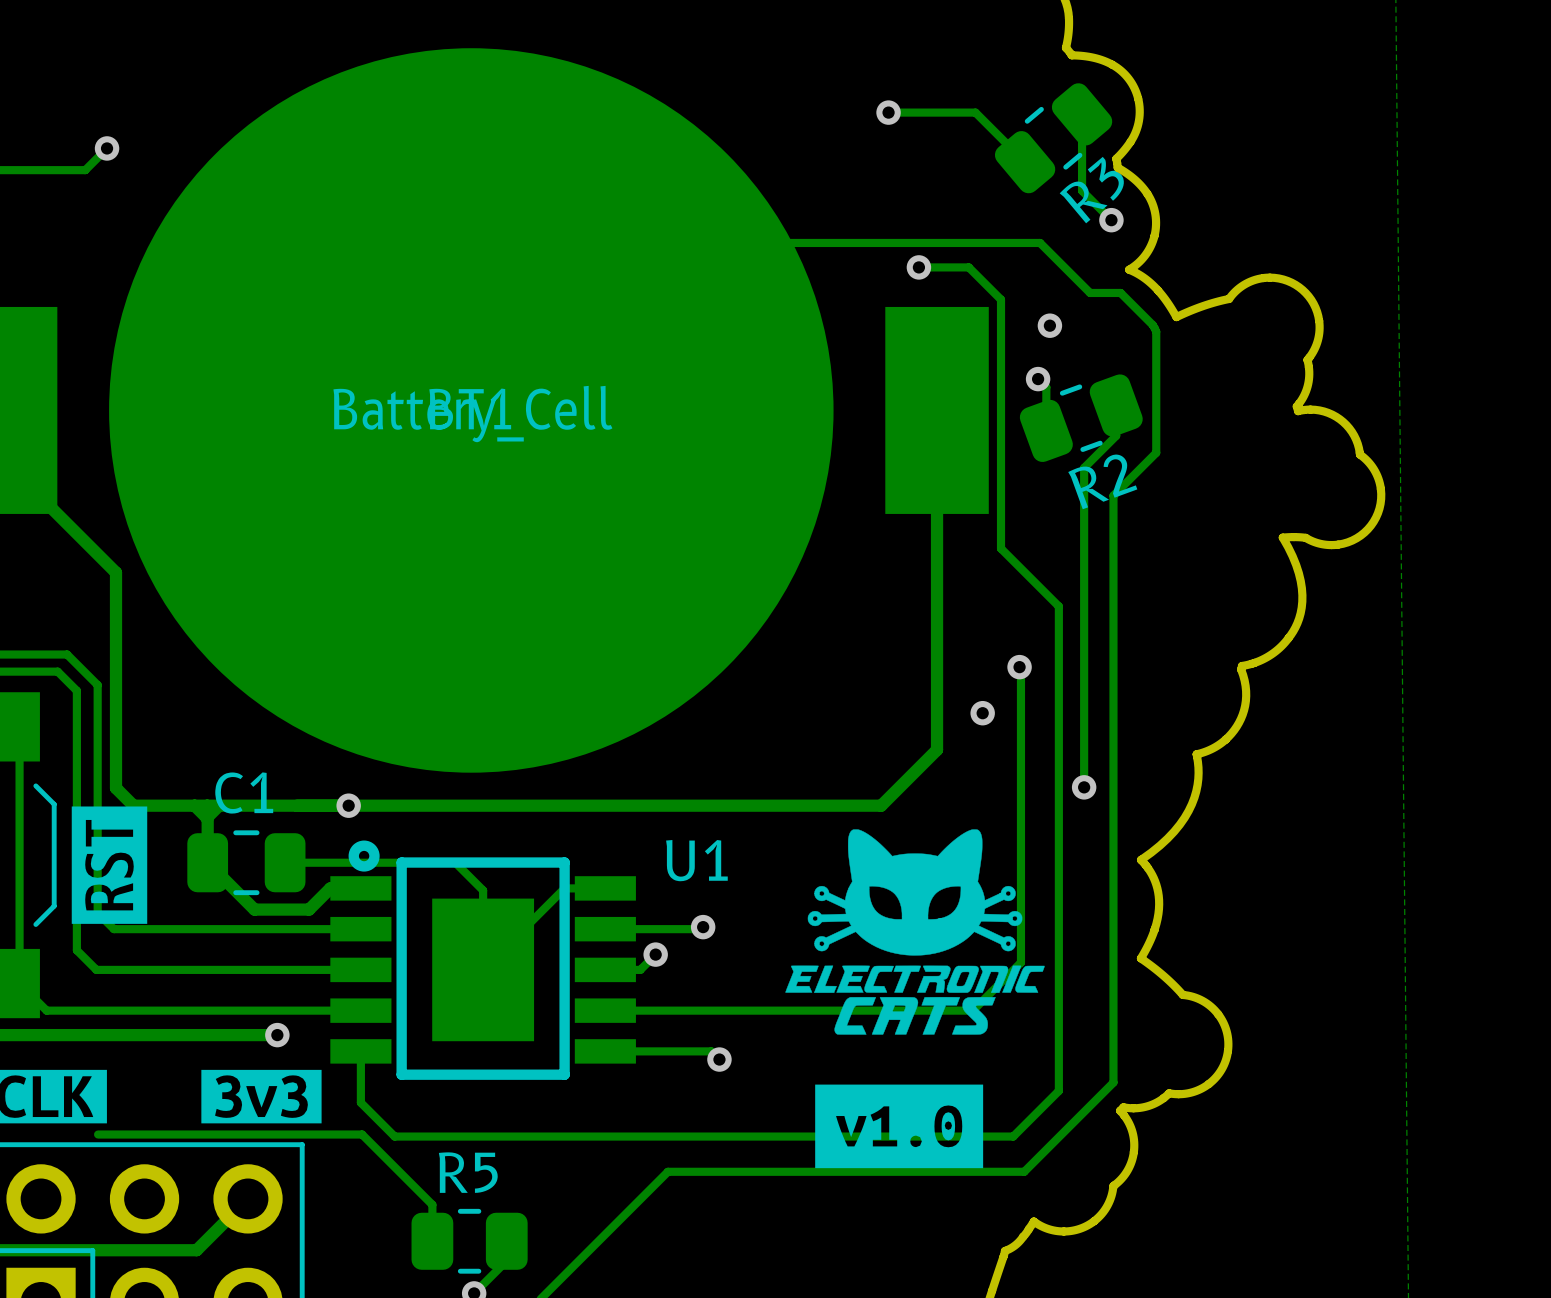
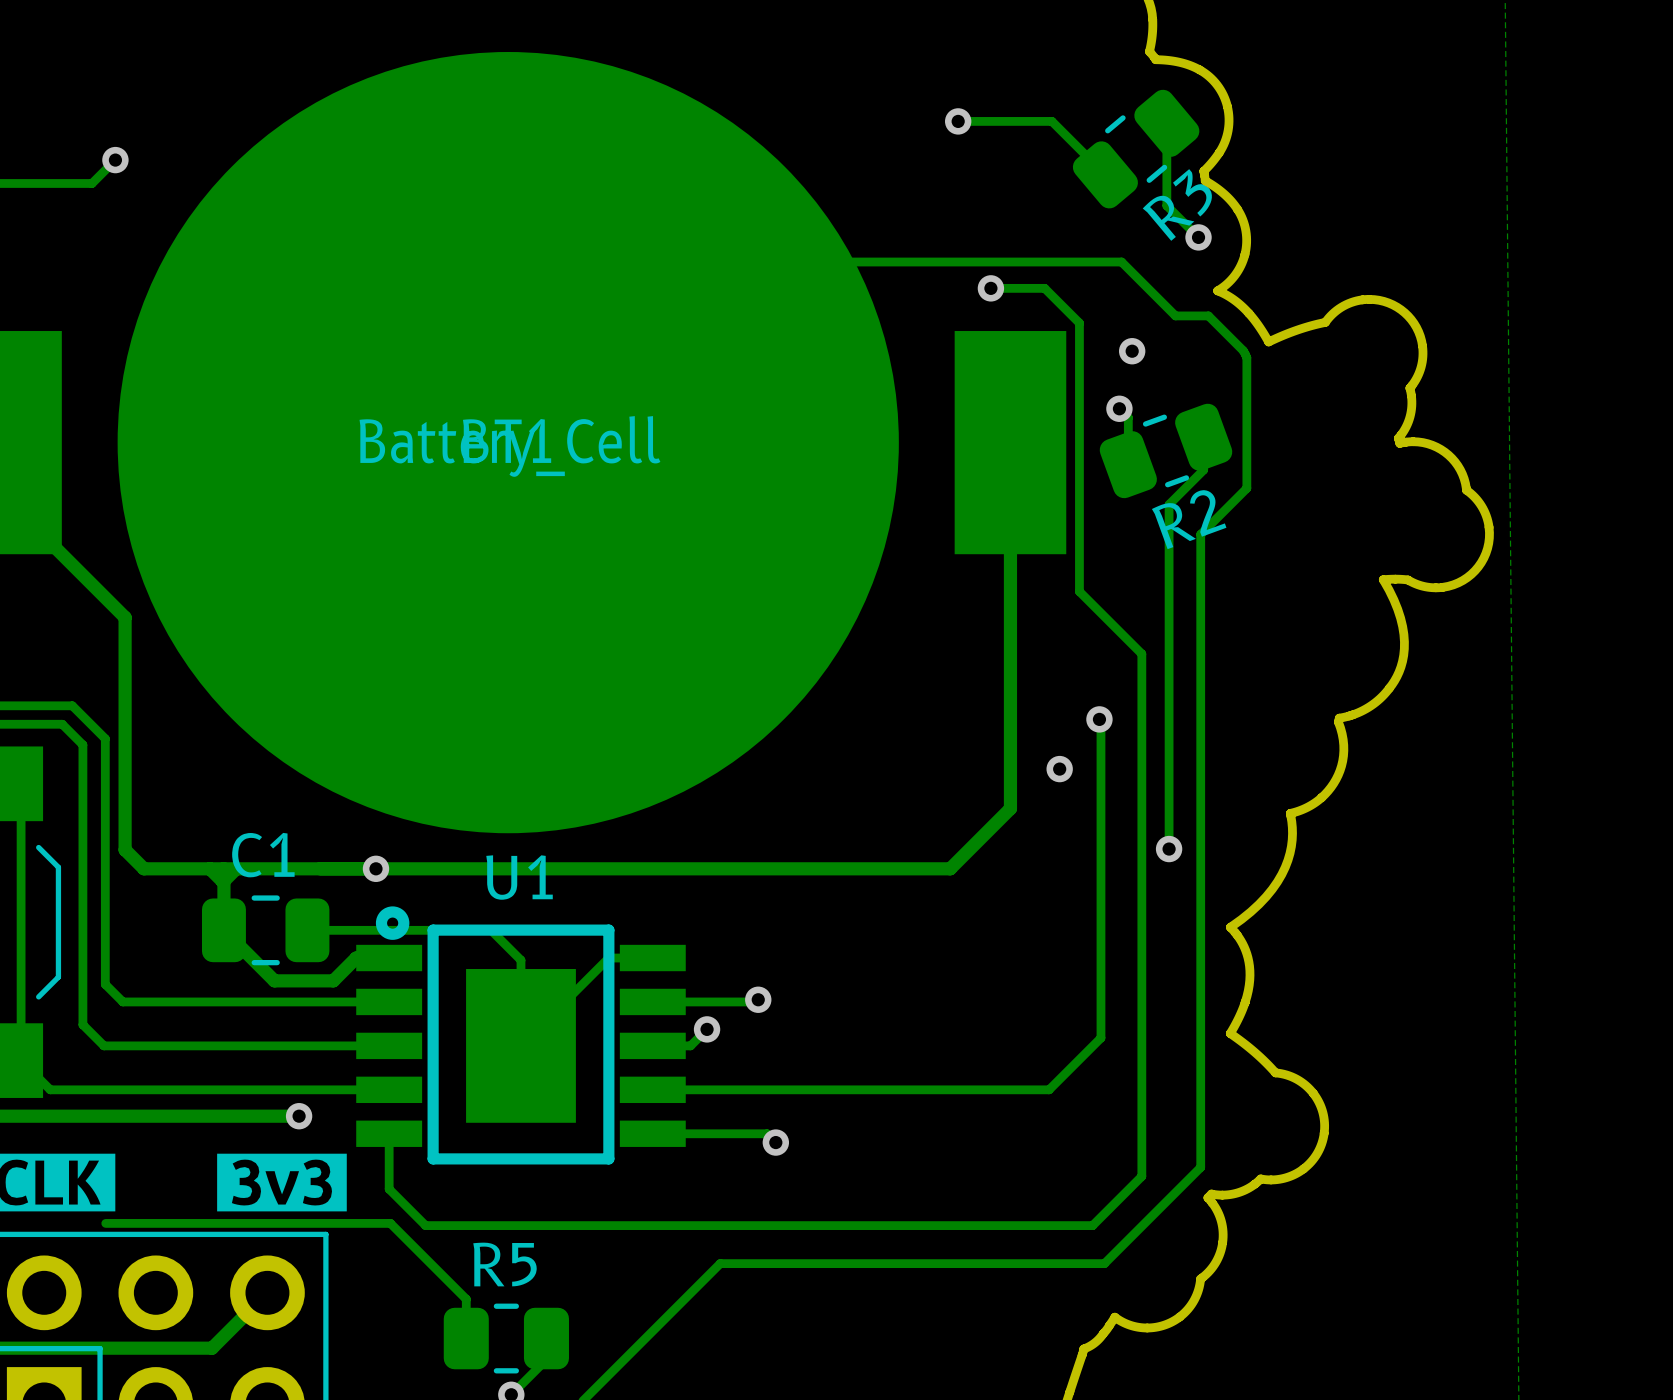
drawing: [71, 806, 148, 924] -> none
drawing: [785, 829, 1045, 1035] -> none
U1 name position: U1 (696, 860) -> U1 (519, 877)
drawing: [815, 1084, 984, 1169] -> none

